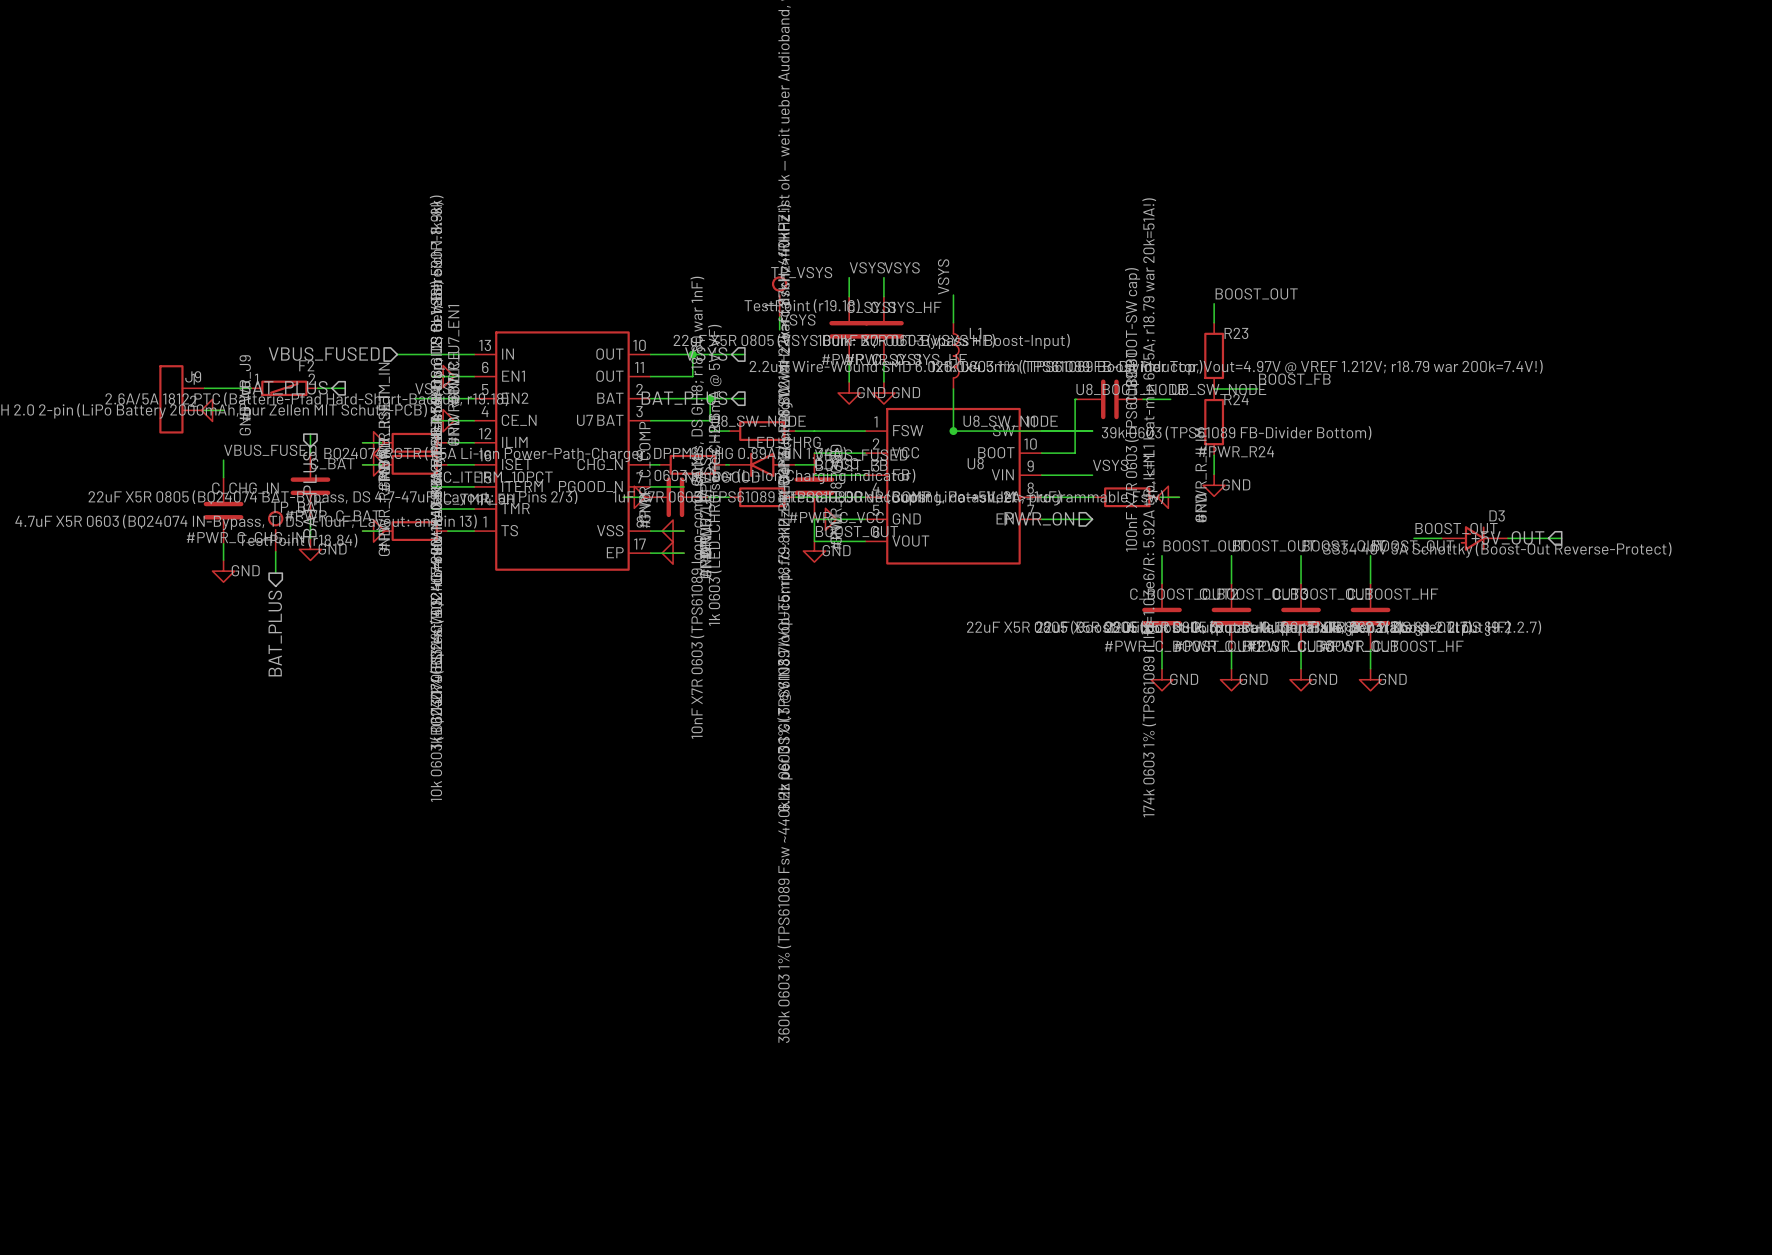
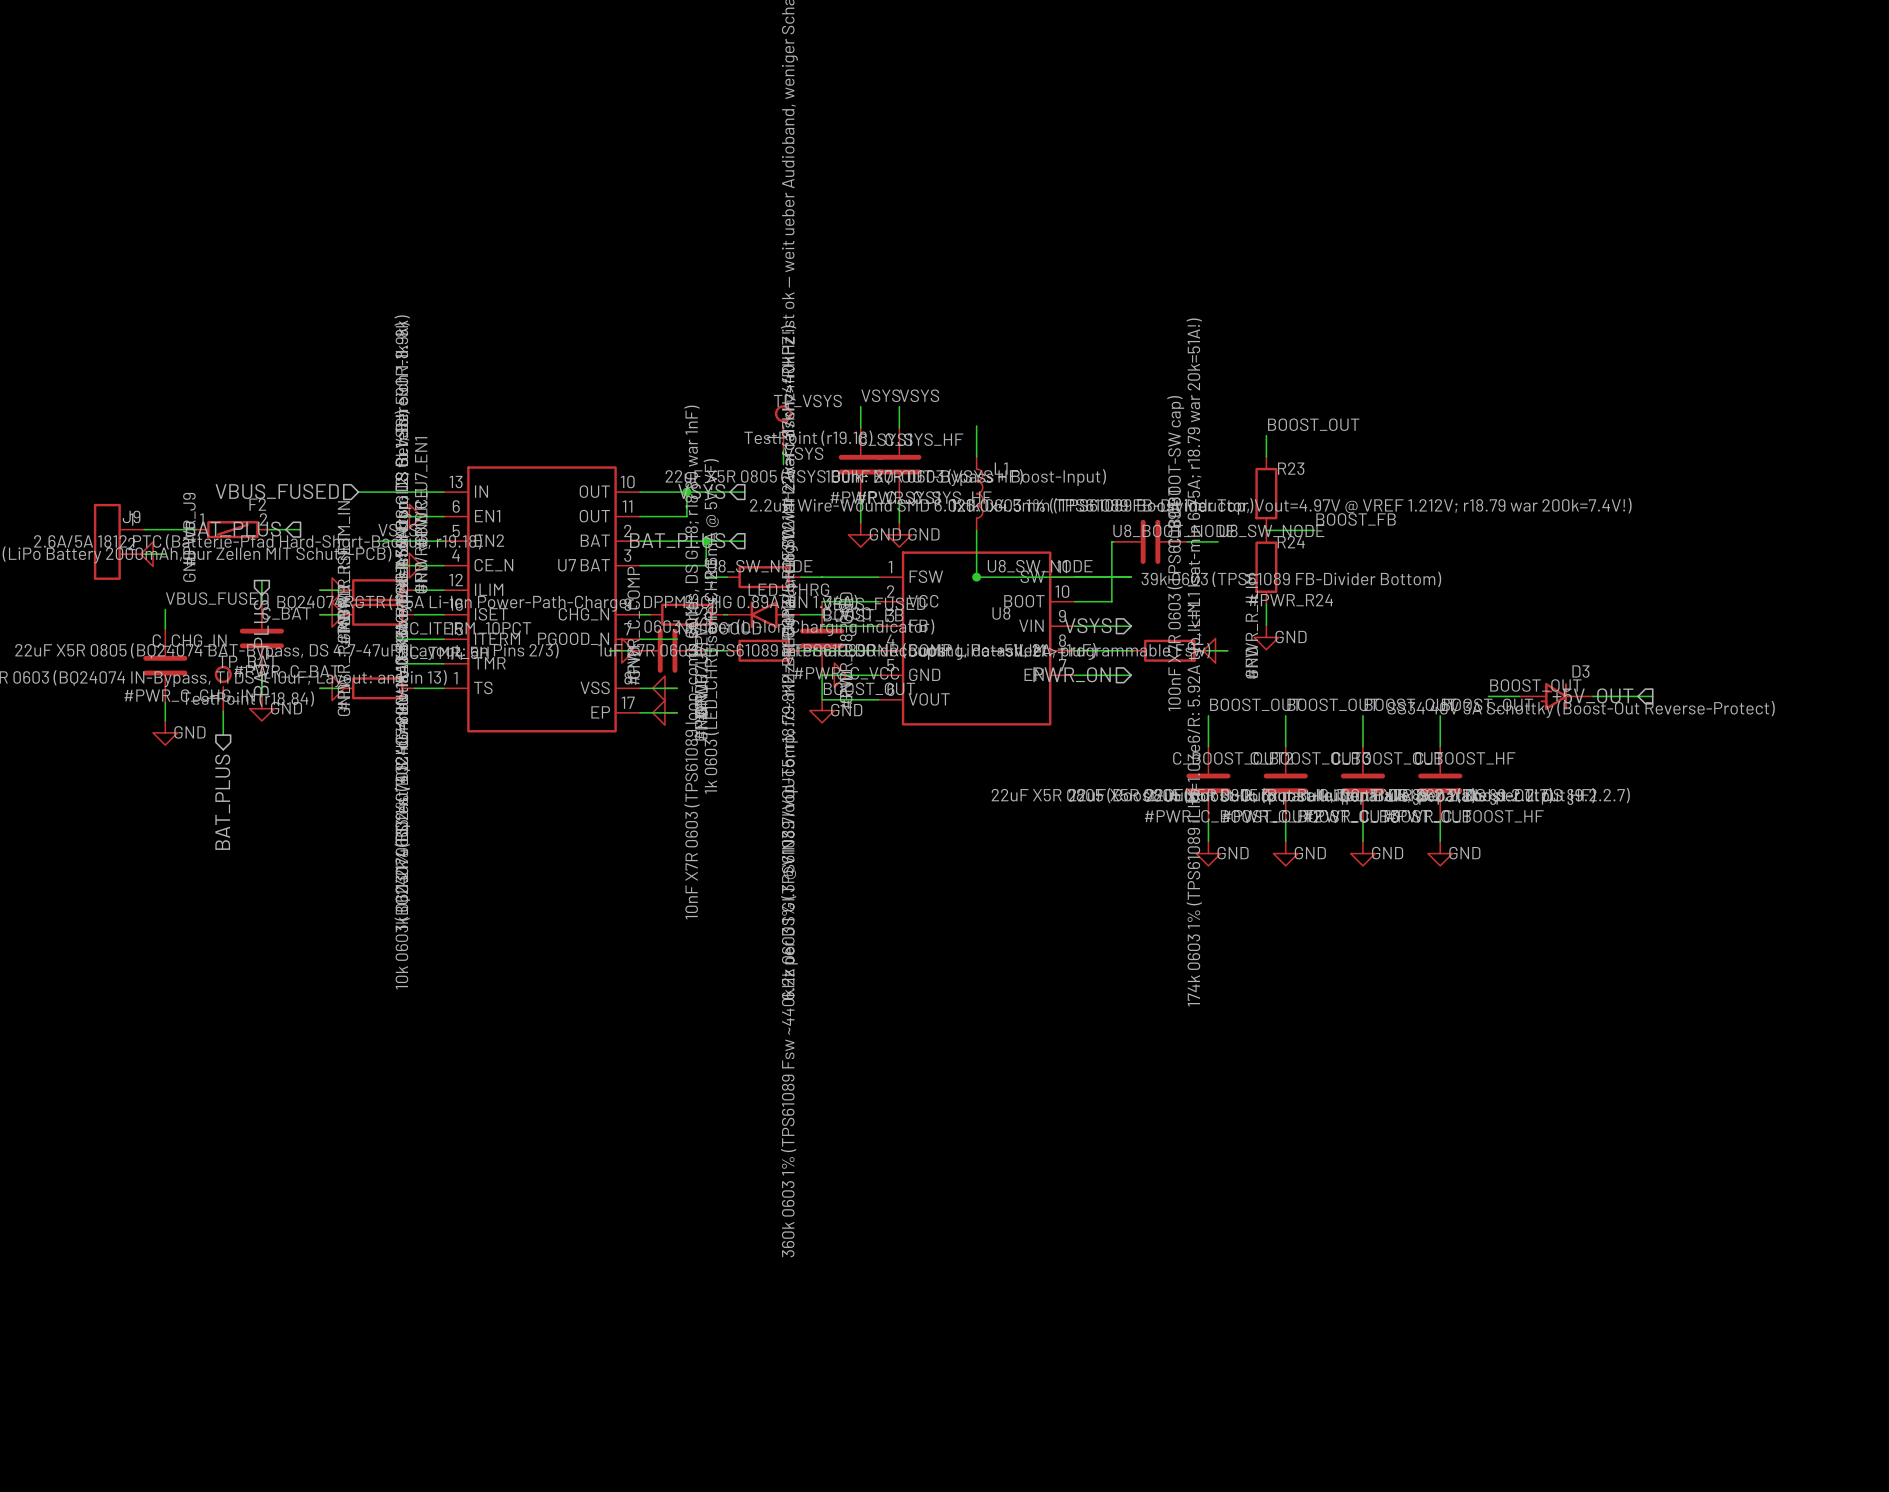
label: VSYS (943, 276) -> none
label: VSYS (1110, 465) -> none
hierarchical label: none -> VSYS (1088, 625)

